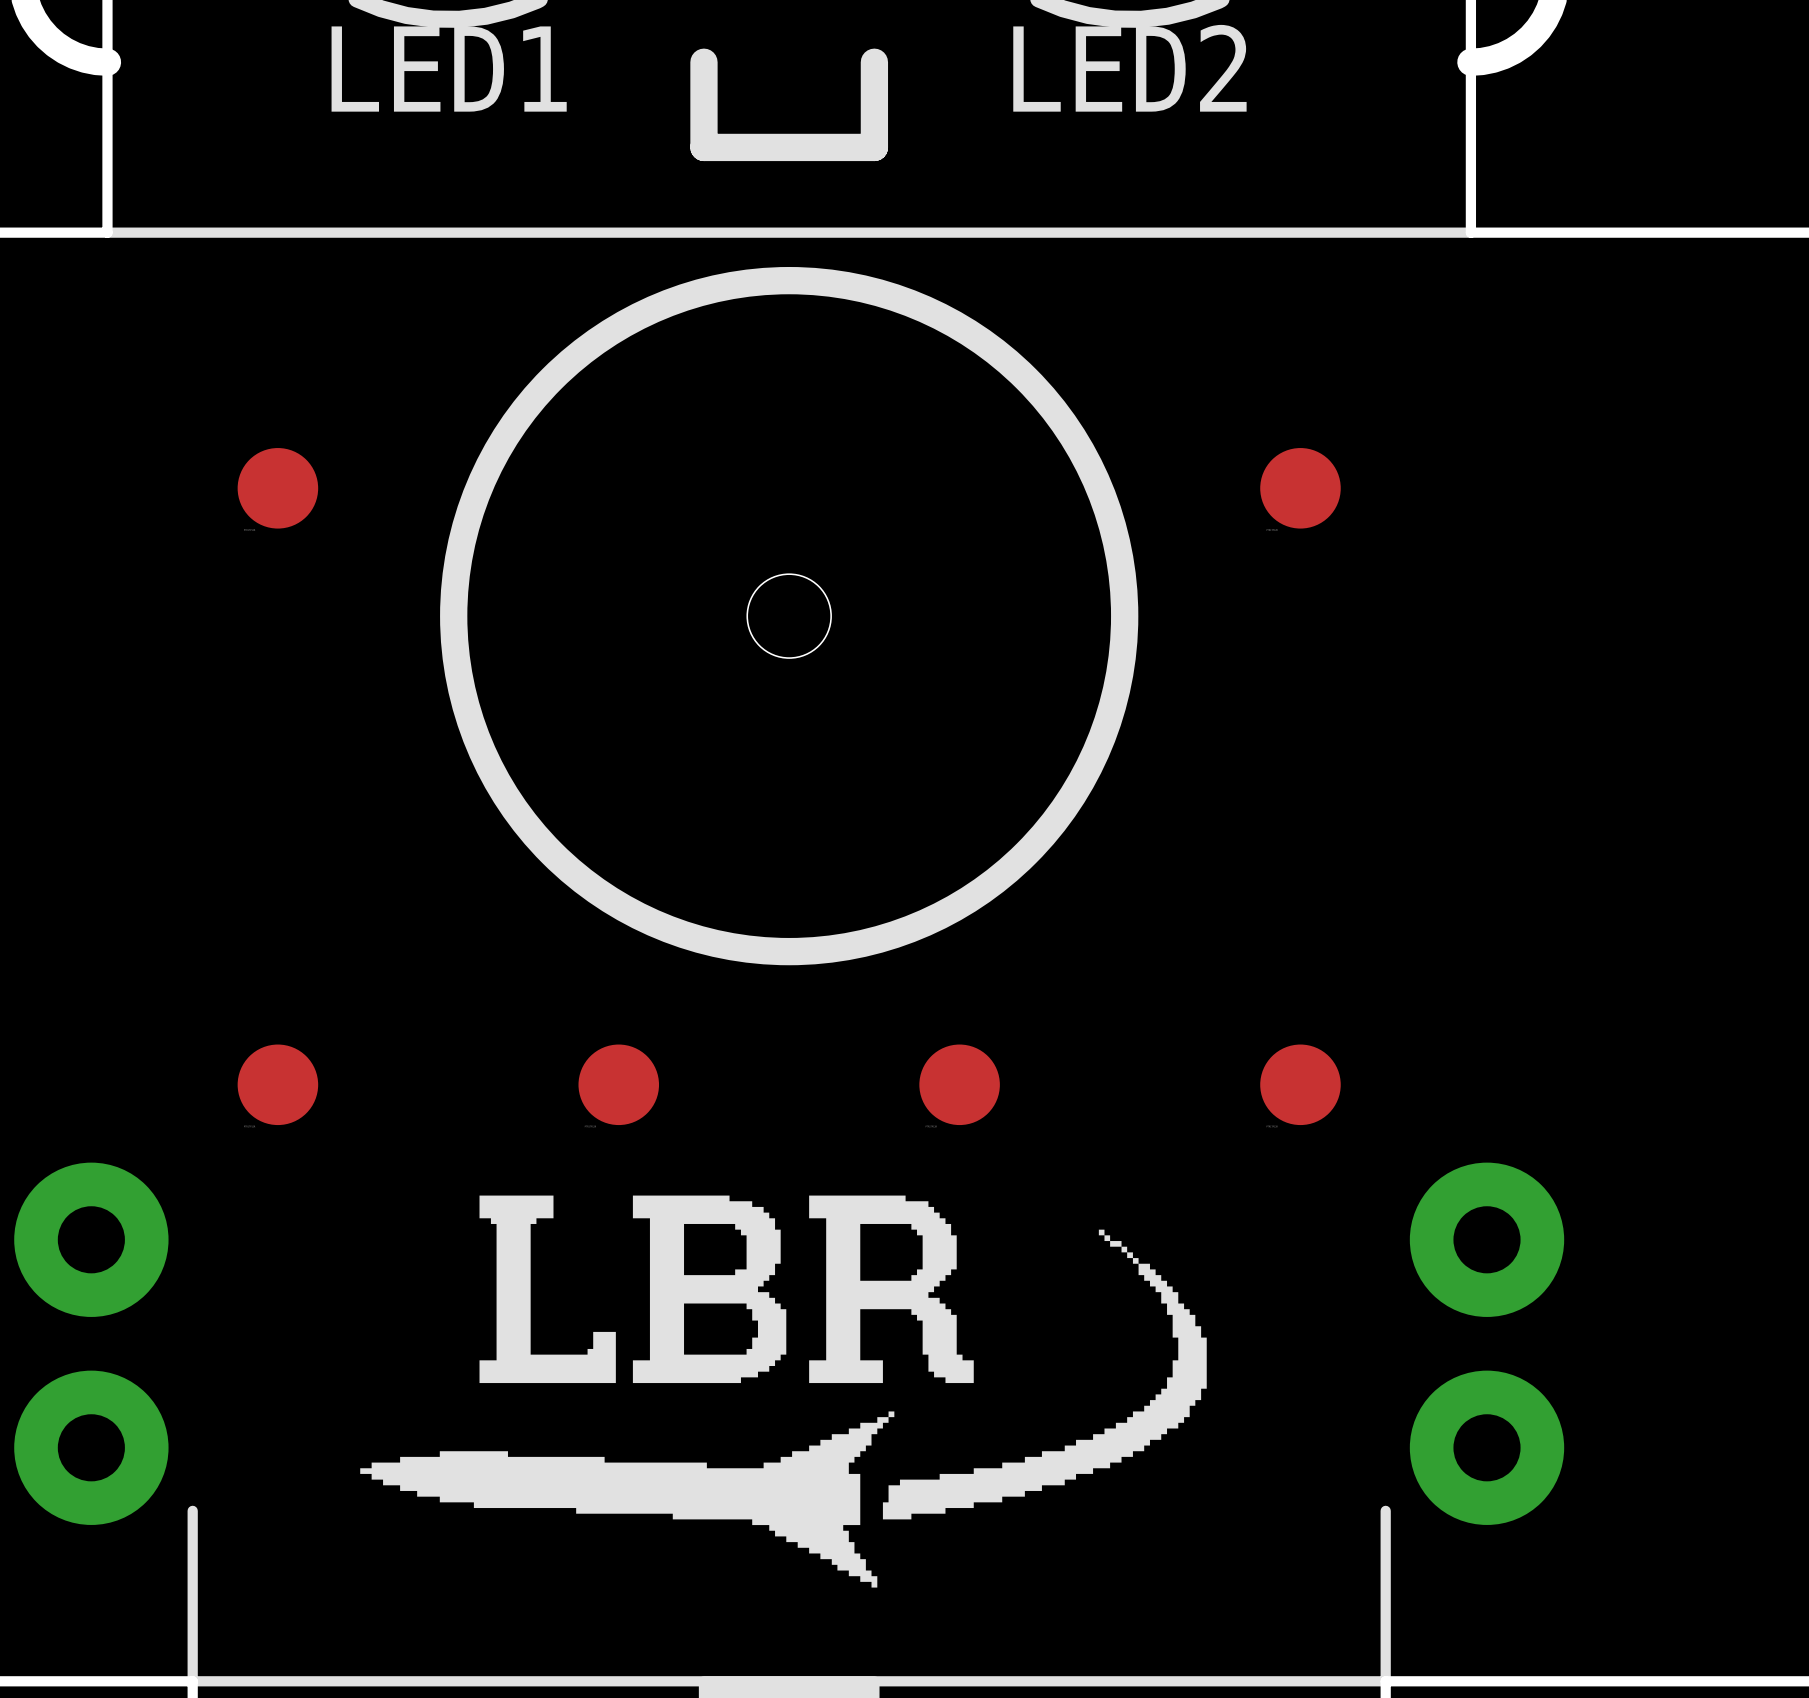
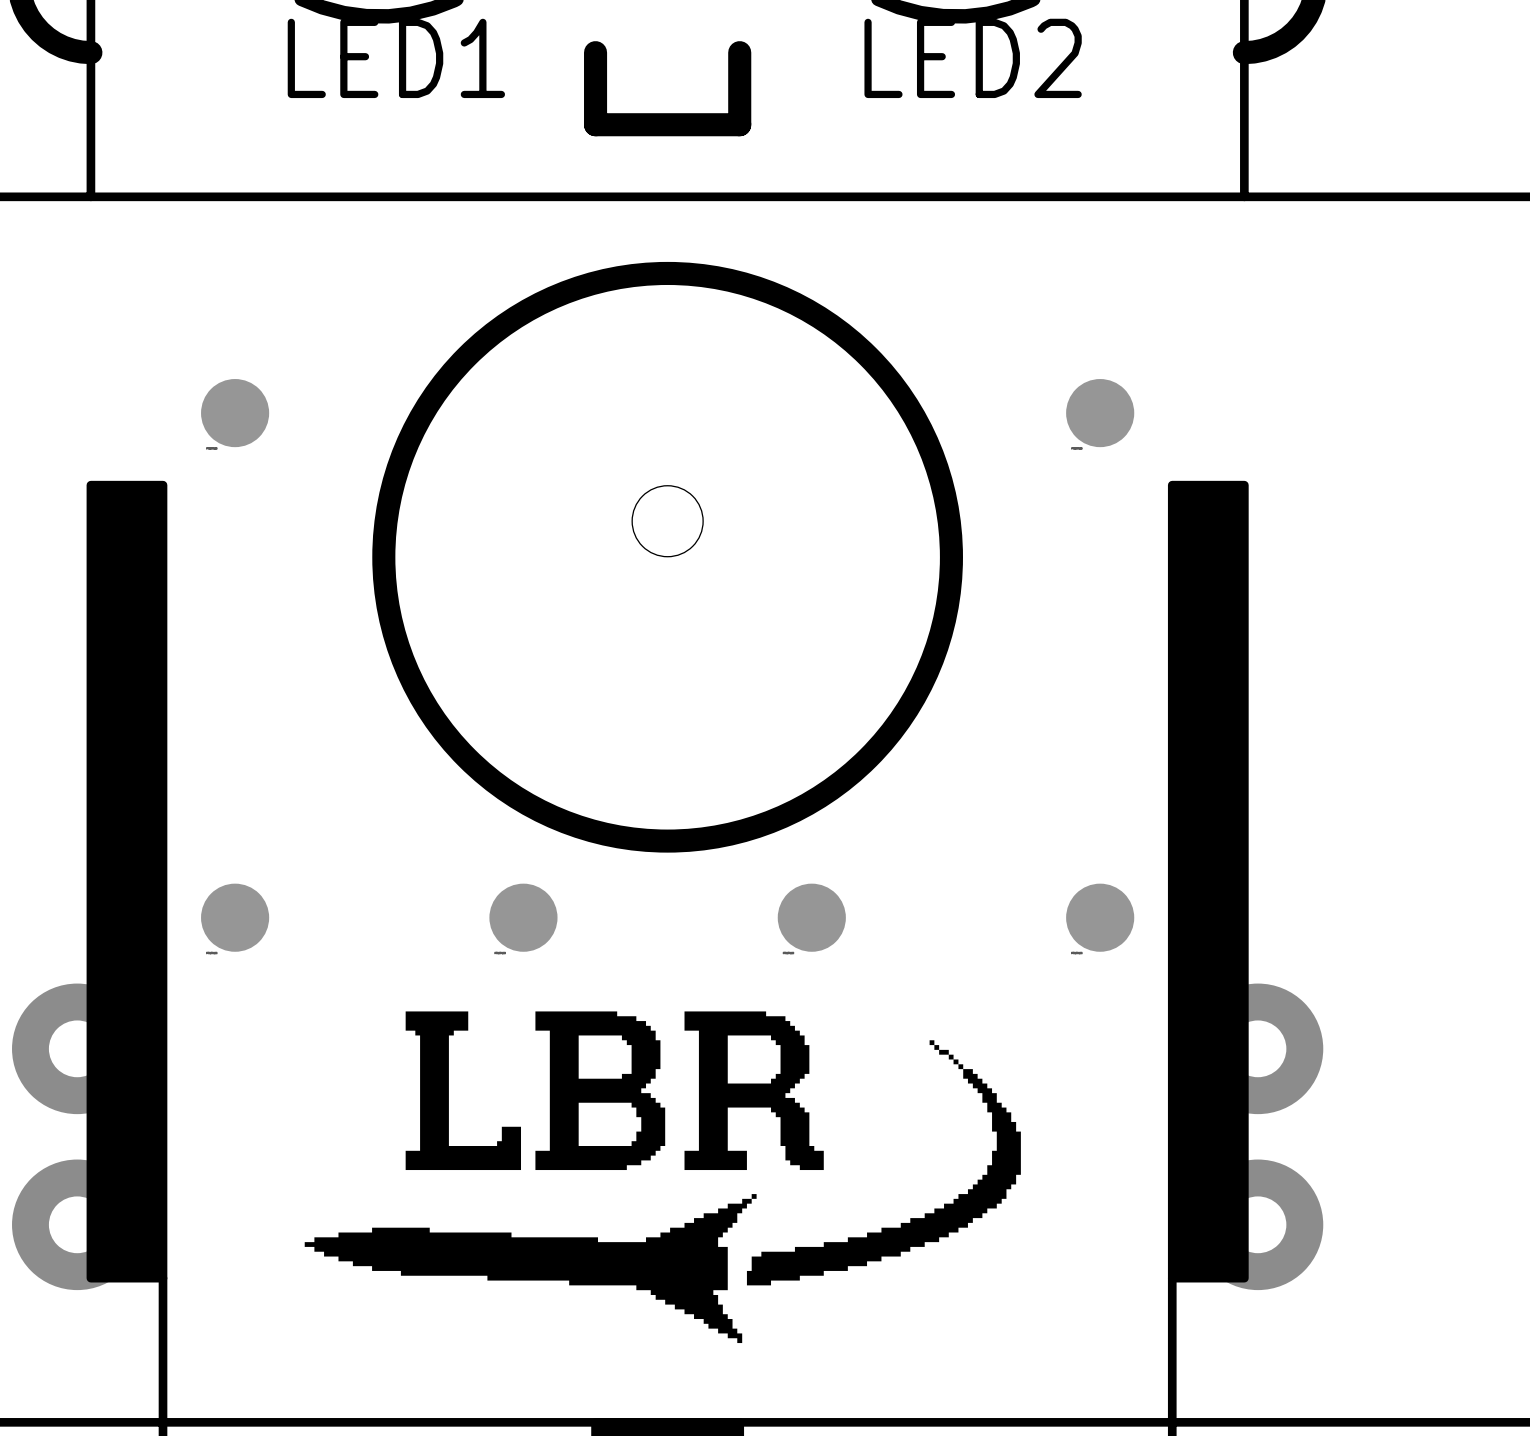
drawing: none -> [86, 480, 168, 1283]
drawing: none -> [1167, 480, 1249, 1283]
drawing position: (789, 616) -> (667, 557)

